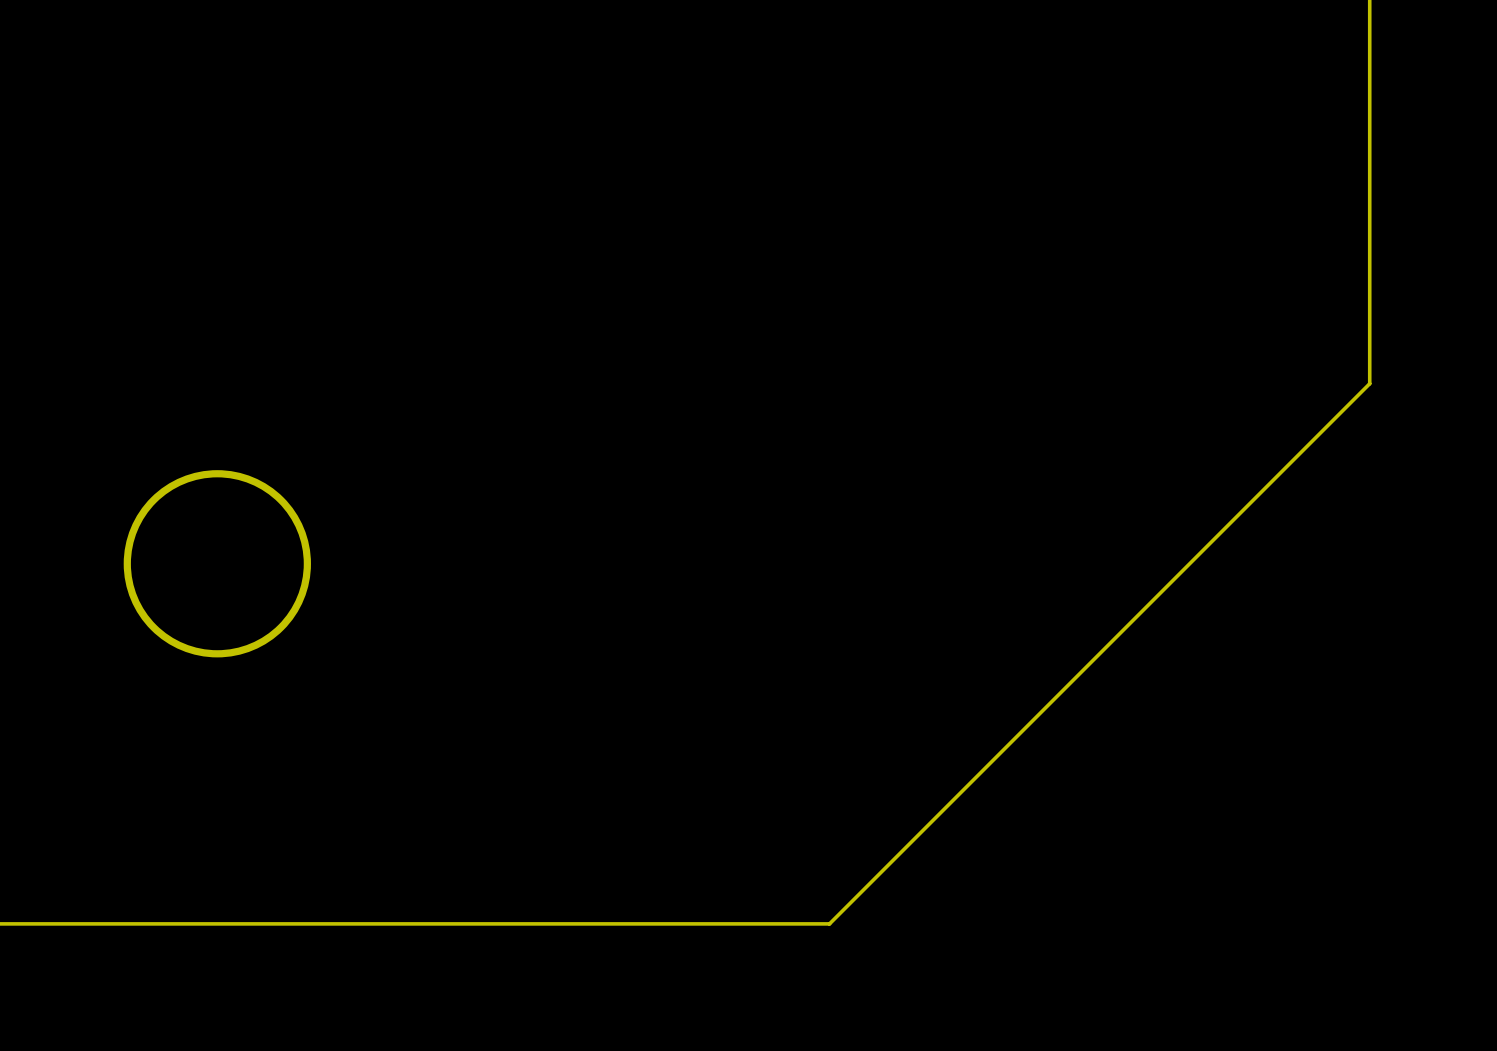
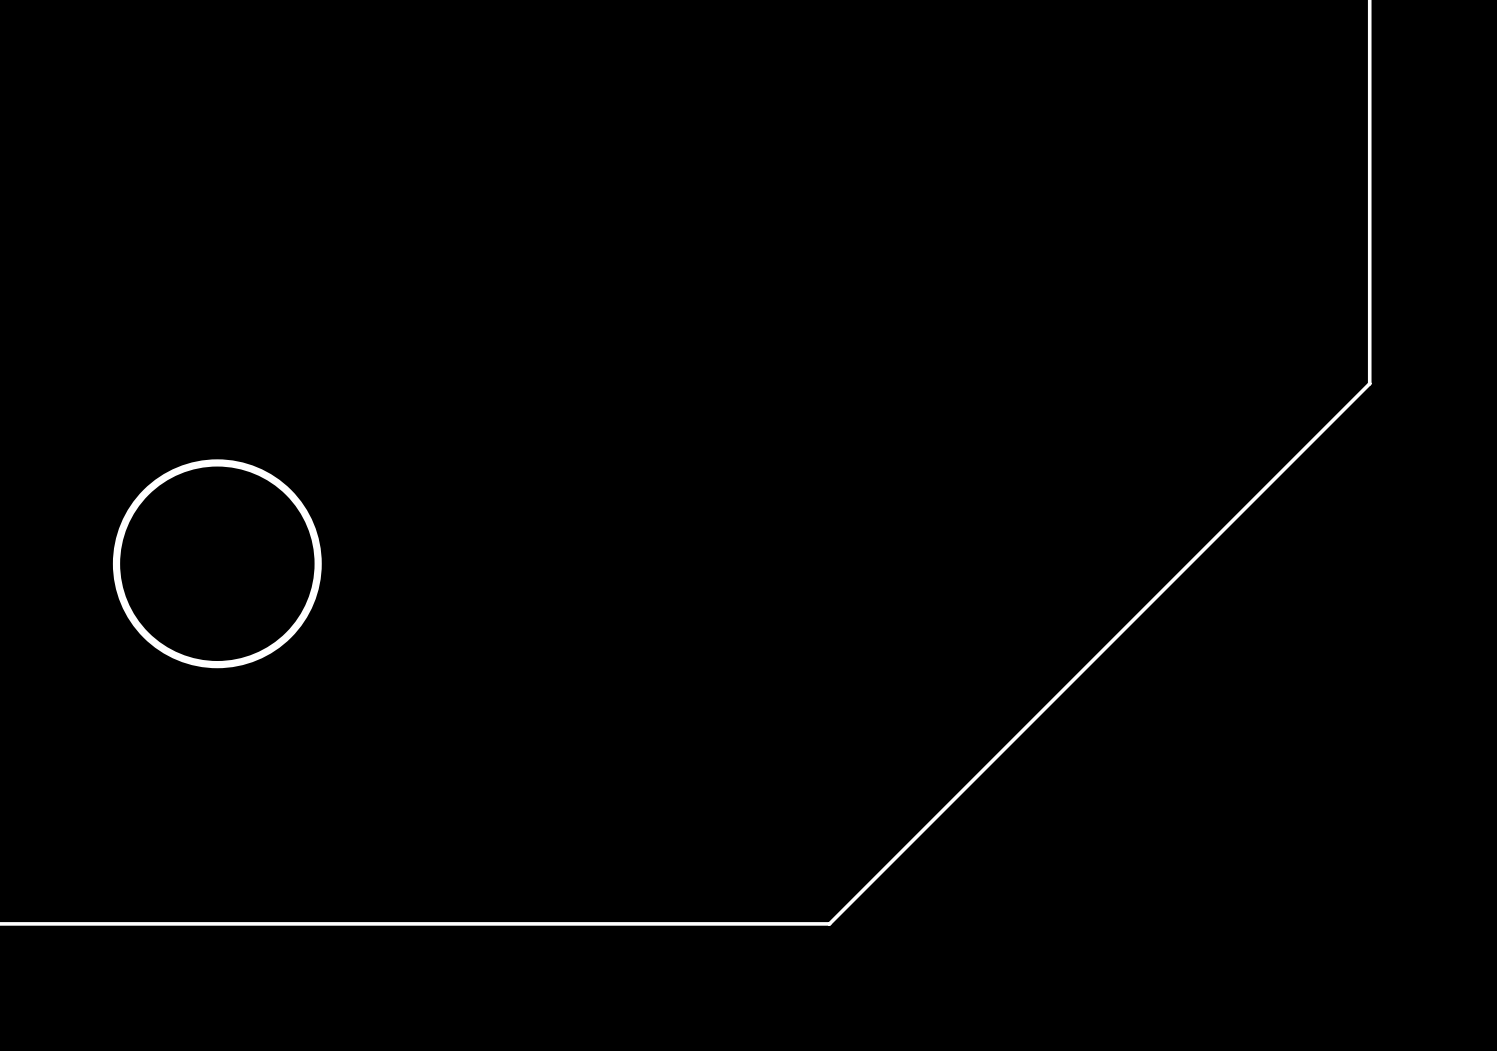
round board edge size: [123, 470, 311, 658] -> [112, 459, 322, 669]

